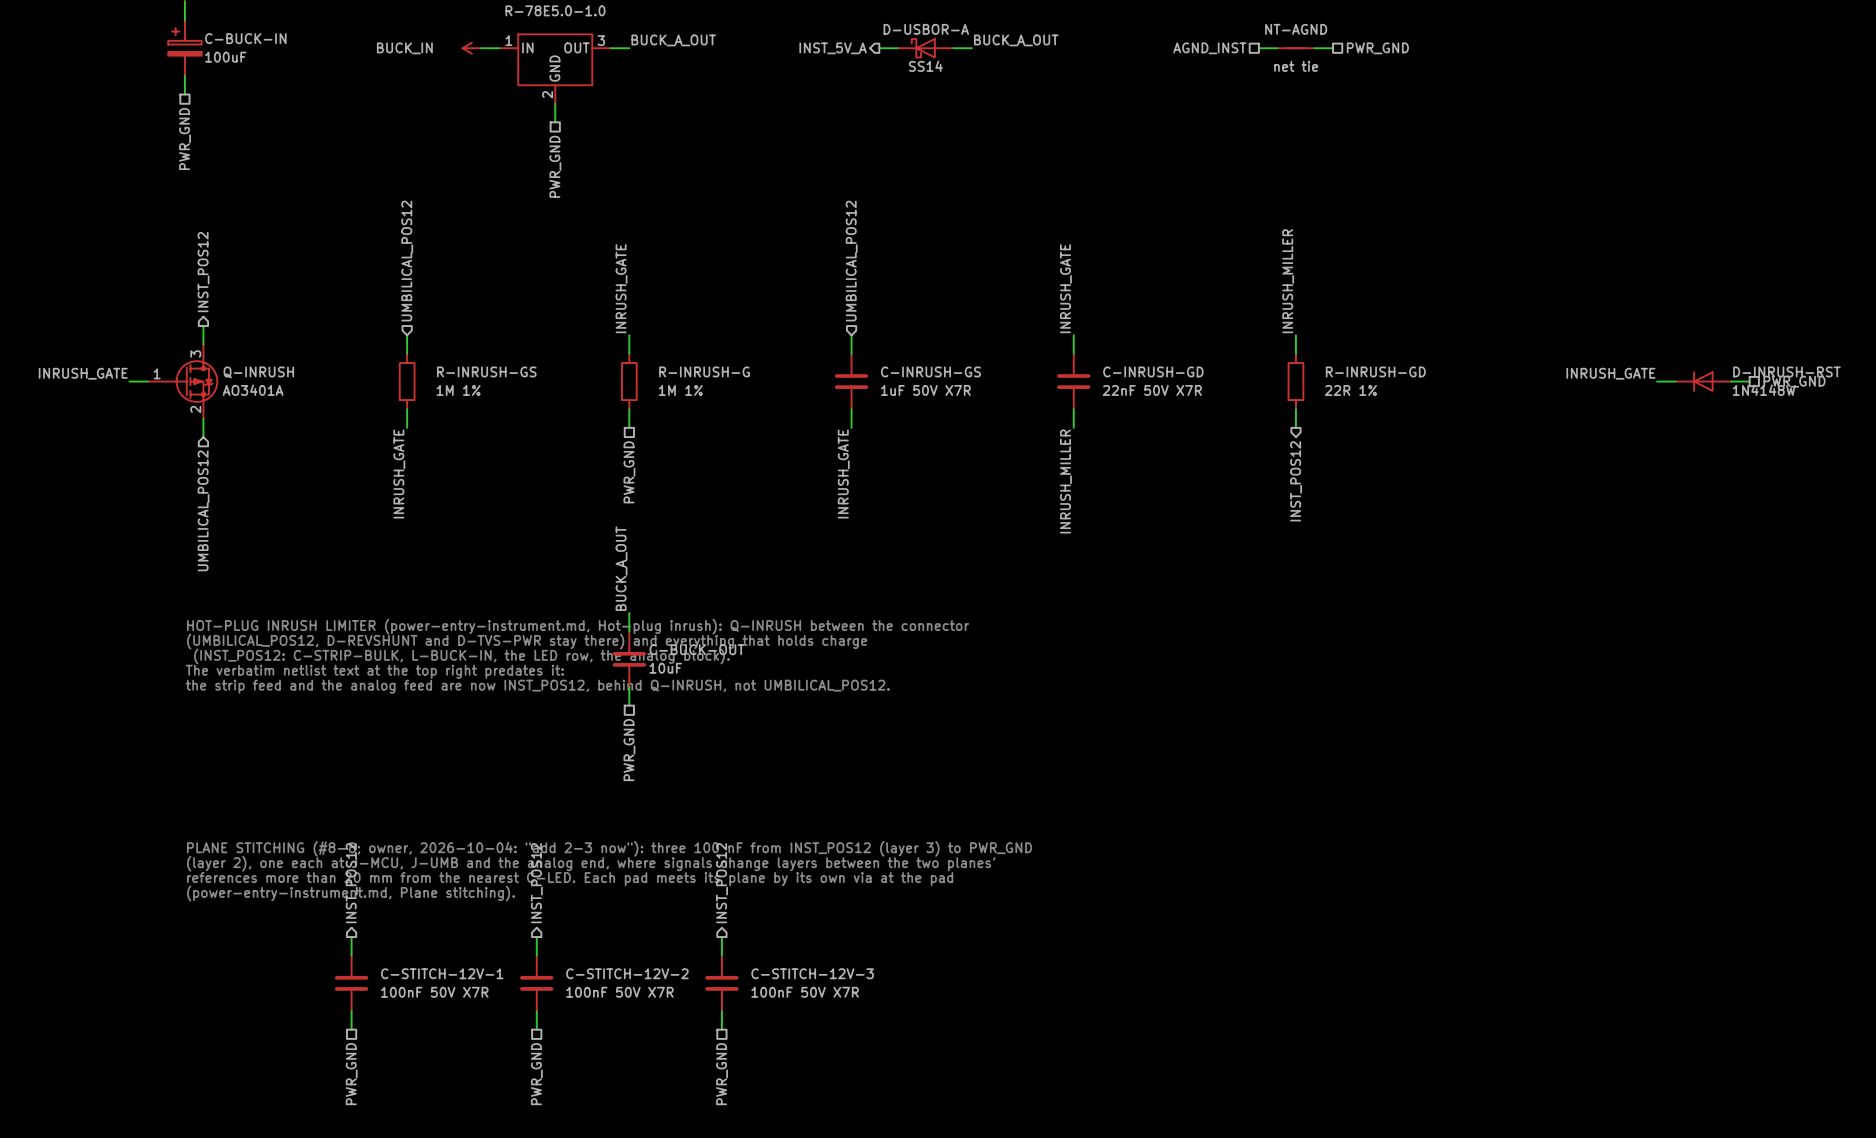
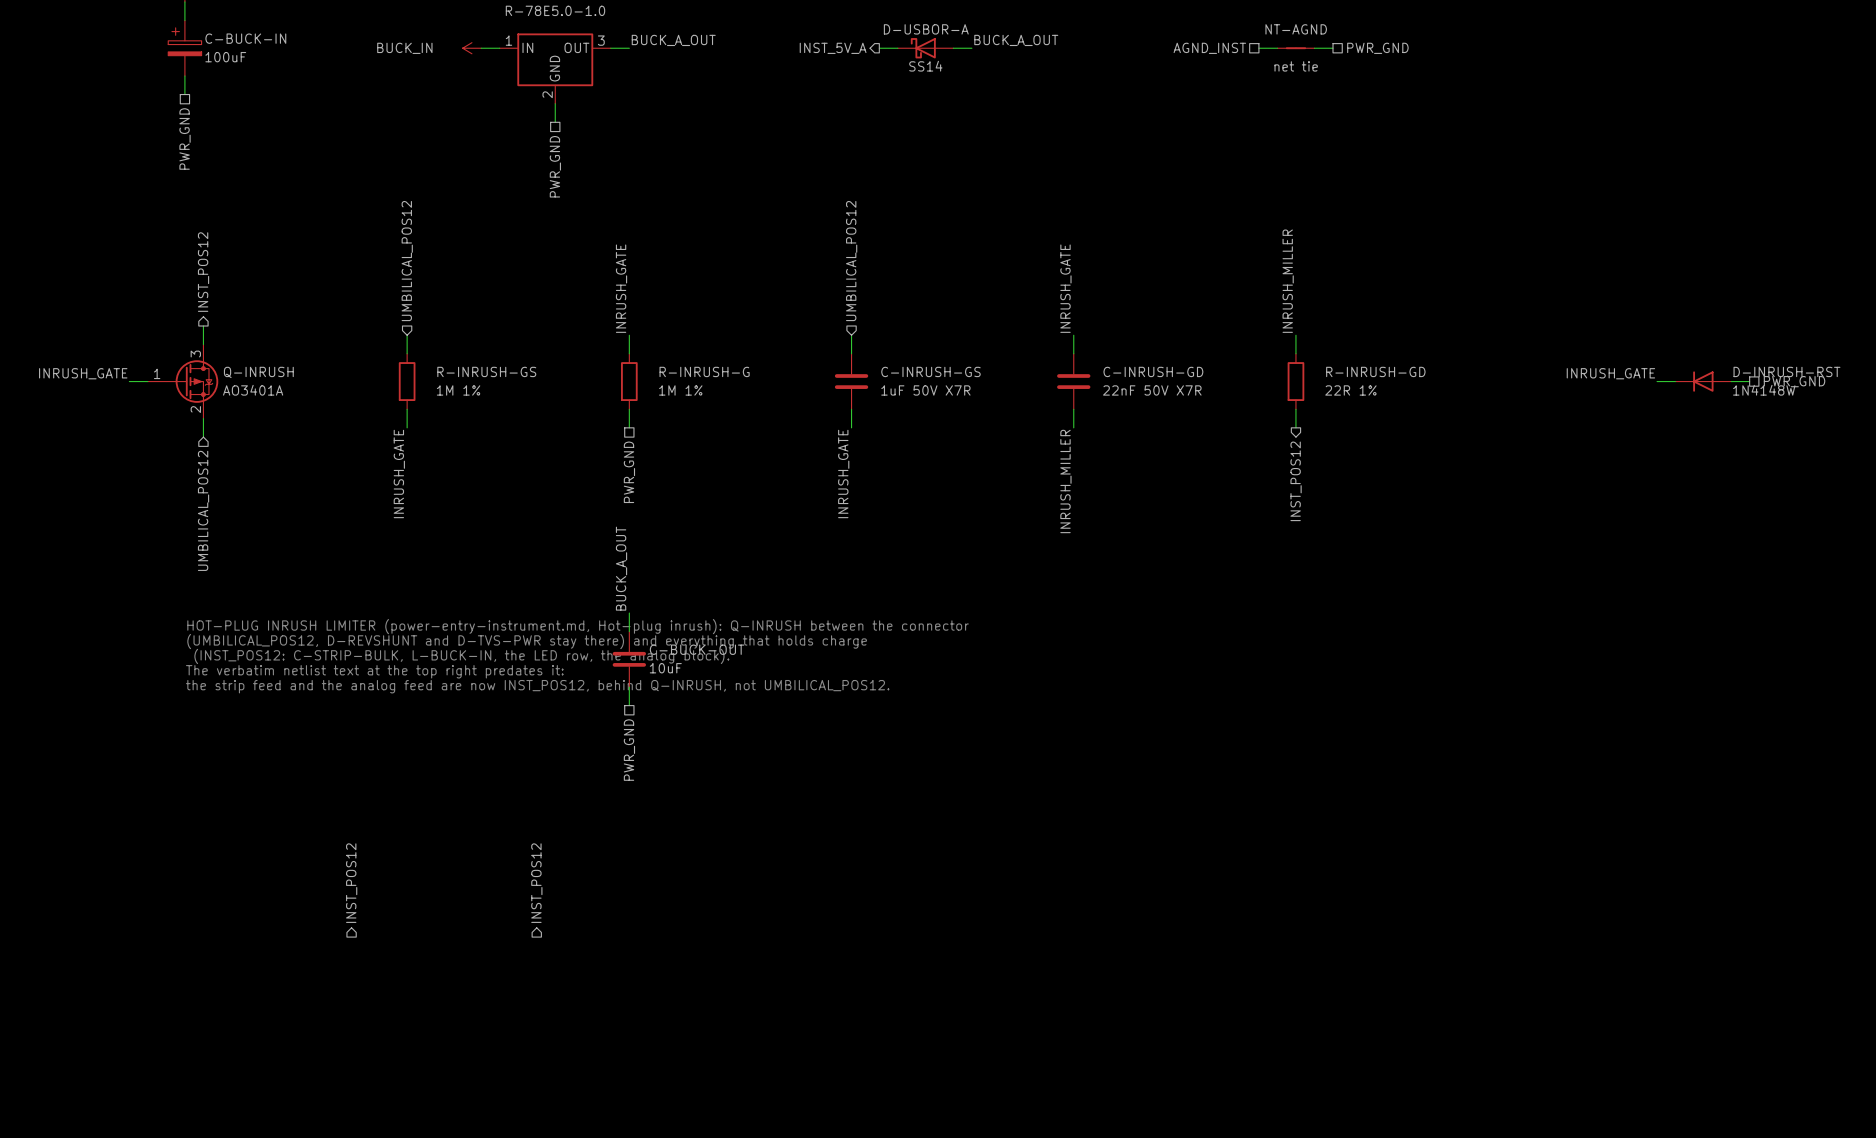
text: PLANE STITCHING (#8-8; owner, 2026-10-04: "add 2-3 now"): three 100 nF from INST_POS12 (layer 3) to PWR_GND (609, 848) -> none
text: (layer 2), one each at J-MCU, J-UMB and the analog end, where signals change layers between the two planes' (591, 863) -> none
text: references more than 20 mm from the nearest C-LED. Each pad meets its plane by its own via at the pad (570, 879) -> none
hierarchical label: INST_POS12 (722, 883) -> none
text: (power-entry-instrument.md, Plane stitching). (350, 893) -> none
wire: (351, 937) (351, 955) -> none
wire: (536, 937) (536, 955) -> none
wire: (721, 937) (721, 955) -> none
C-STITCH-12V-1: 100nF 50V X7R (351, 983) -> none
C-STITCH-12V-2: 100nF 50V X7R (536, 983) -> none
C-STITCH-12V-3: 100nF 50V X7R (721, 983) -> none
wire: (351, 1011) (351, 1029) -> none
wire: (536, 1011) (536, 1029) -> none
wire: (721, 1011) (721, 1029) -> none
hierarchical label: PWR_GND (351, 1074) -> none
hierarchical label: PWR_GND (536, 1074) -> none
hierarchical label: PWR_GND (722, 1074) -> none

